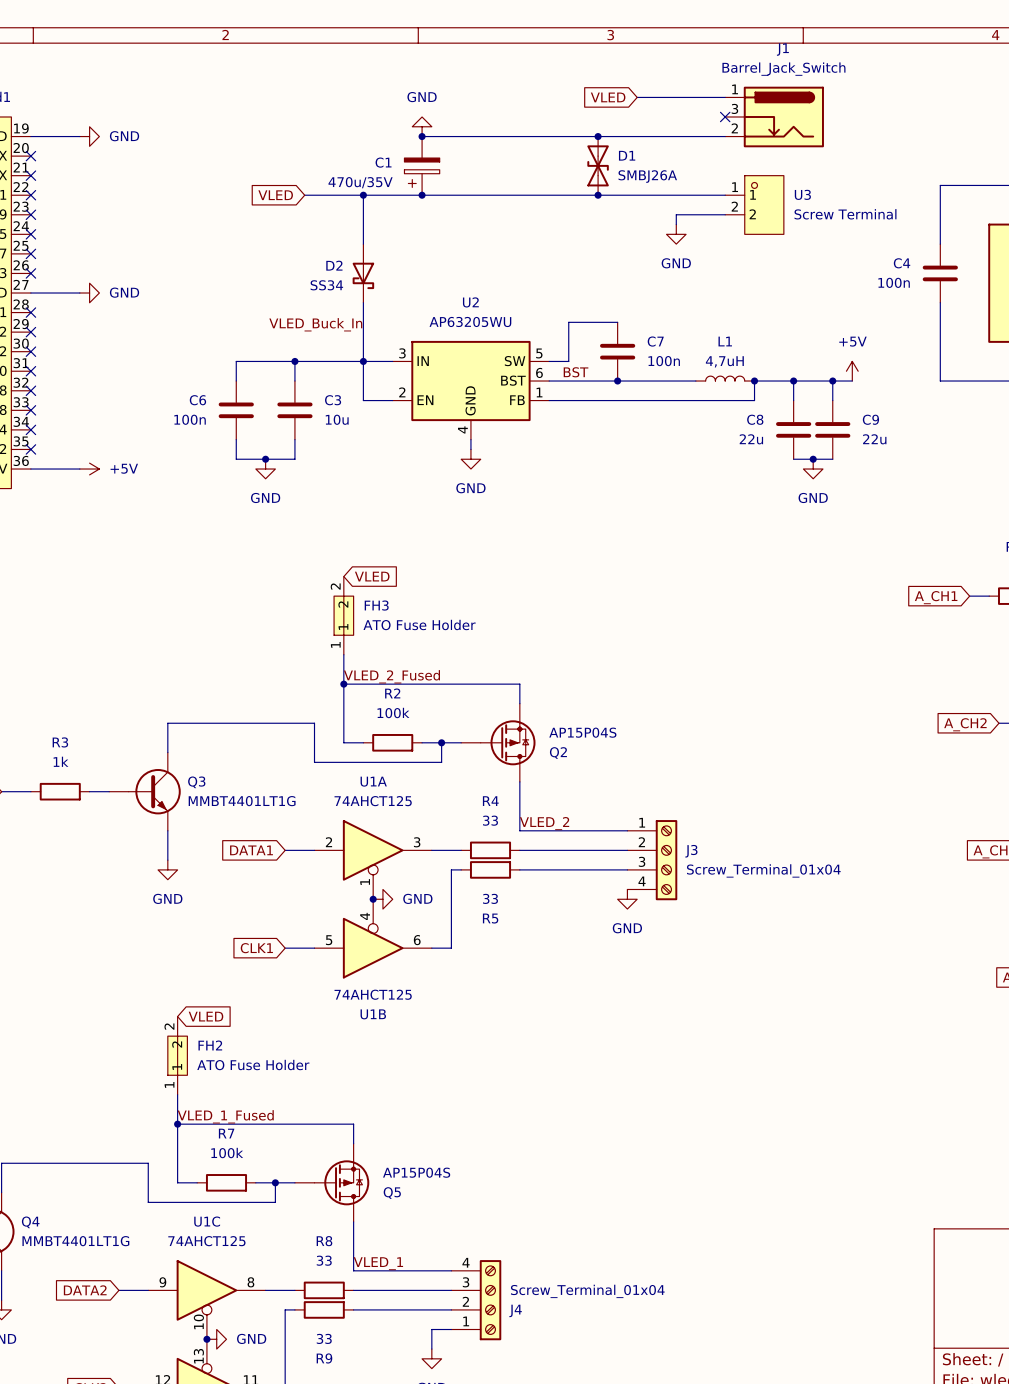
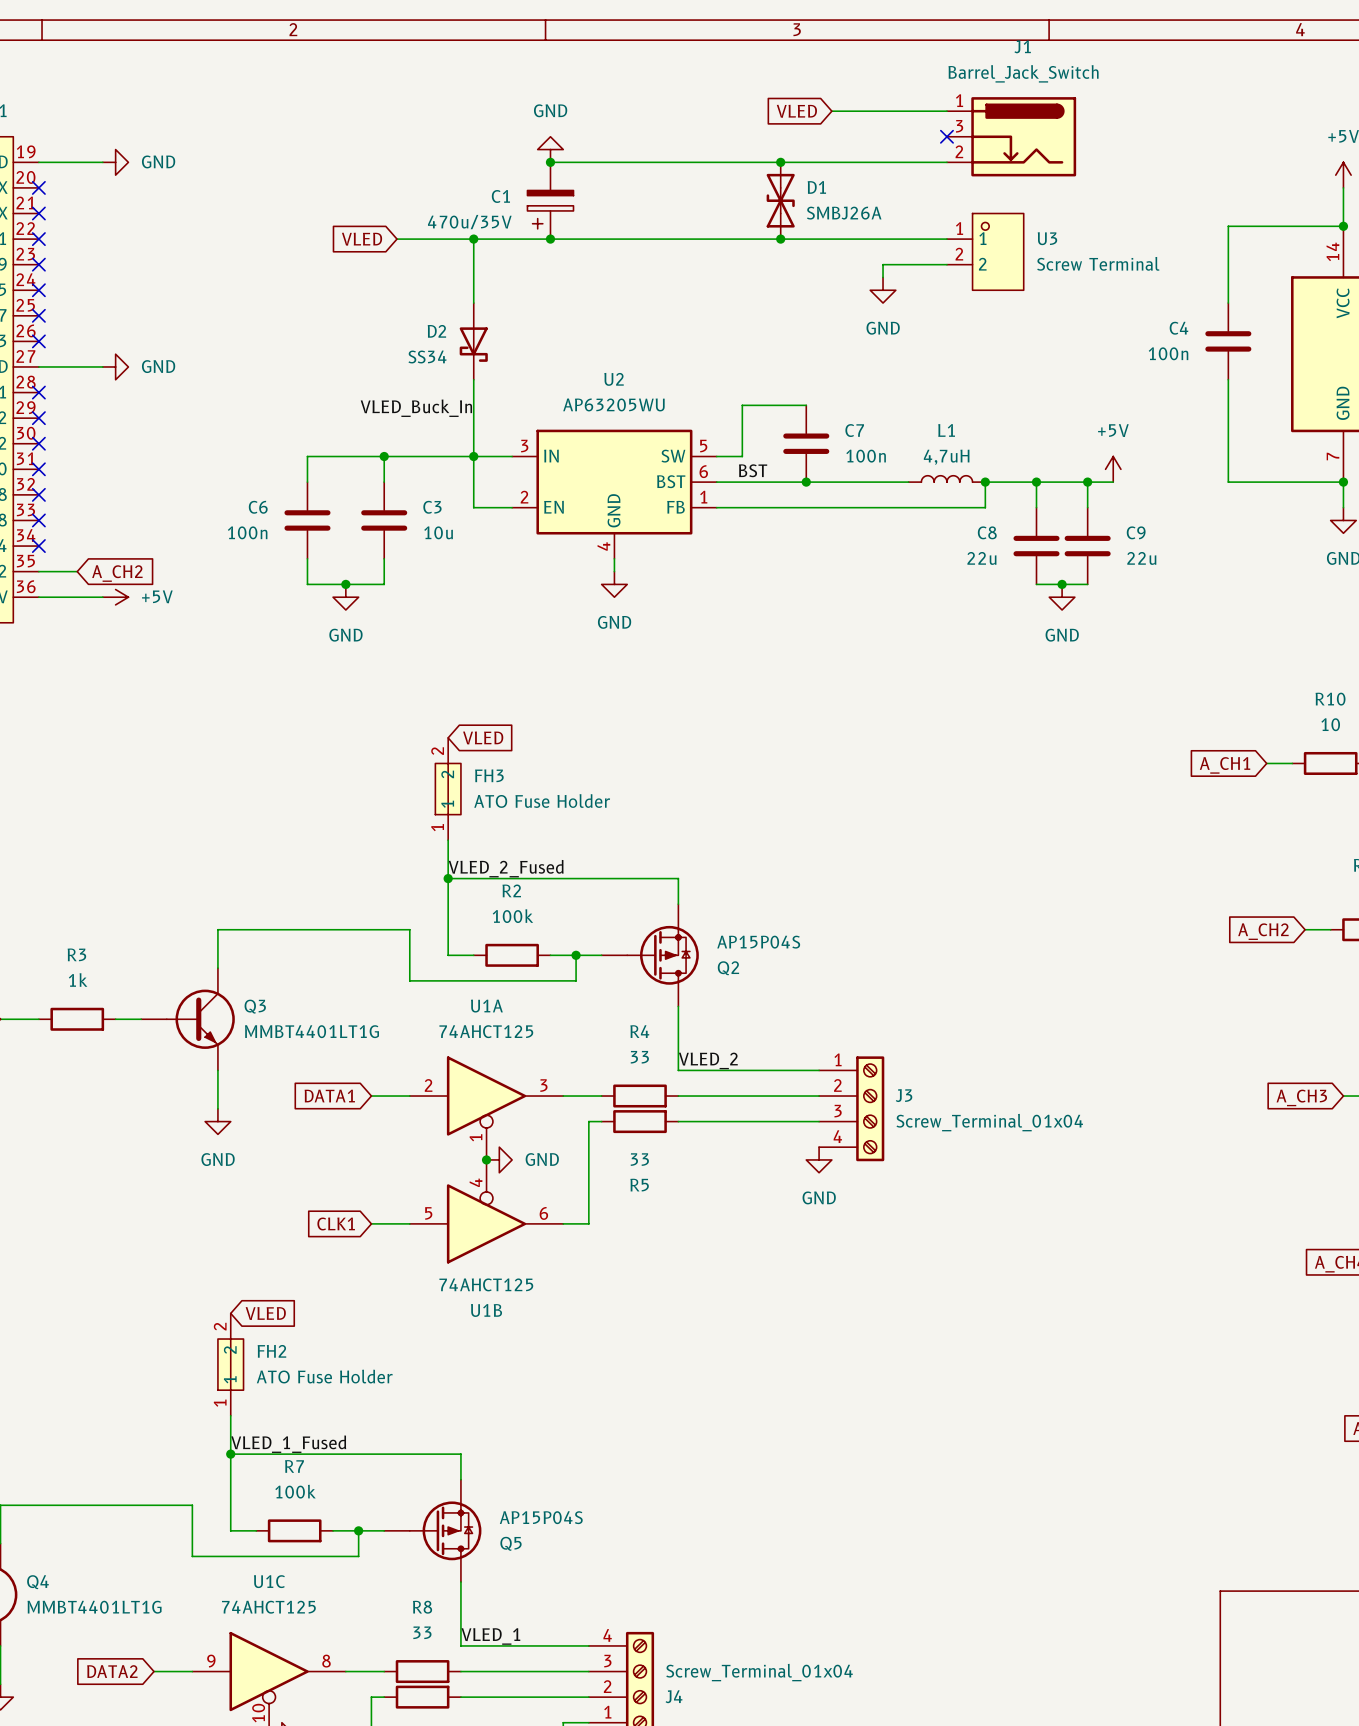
wire: none -> (38, 571) (77, 571)
no-connect mark: (30, 449) -> none
global label: none -> A_CH2 (117, 573)

